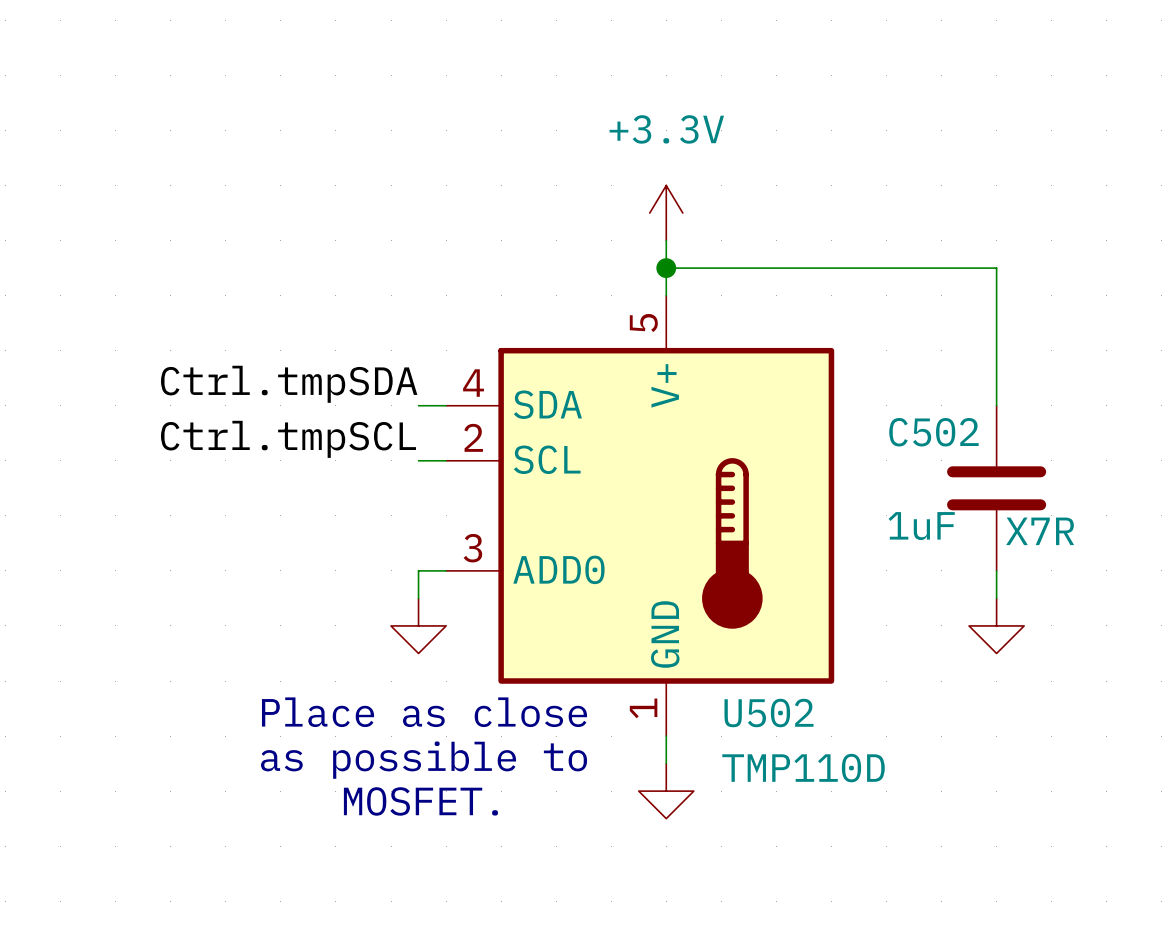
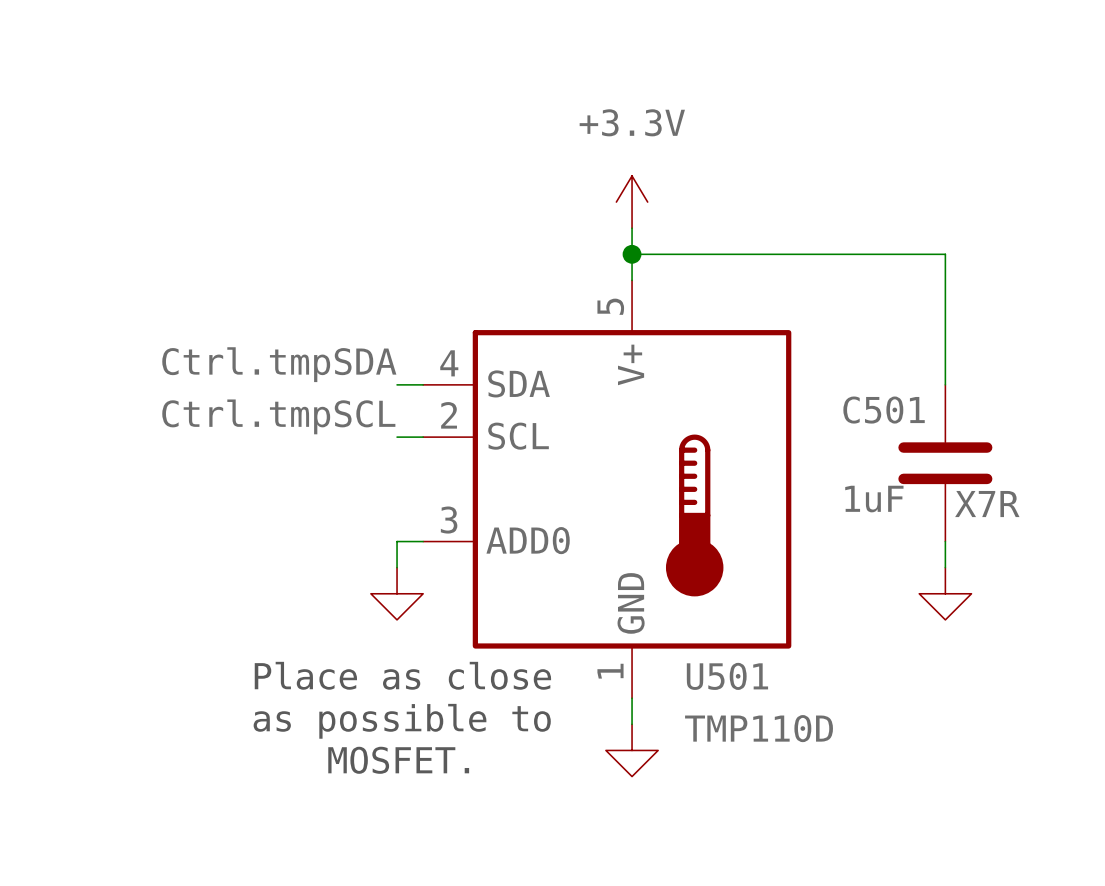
C502 name: C502 (933, 432) -> C501 (884, 410)
U502 name: U502 (768, 713) -> U501 (727, 676)

